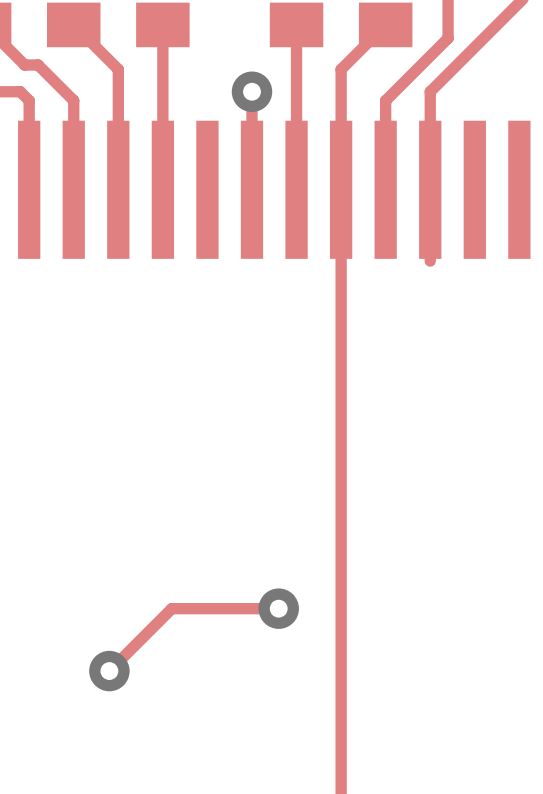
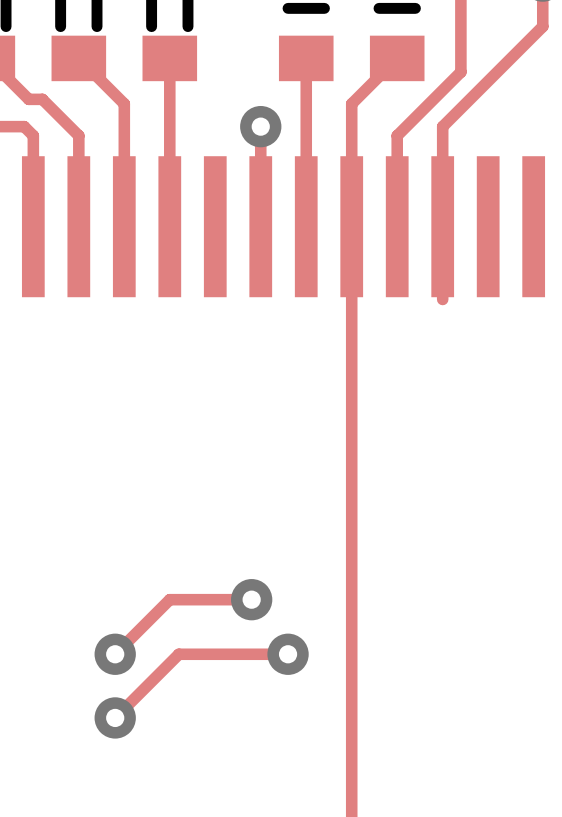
track: none -> (251, 599) (169, 599) (115, 654)
via: none -> (251, 599)
via: none -> (115, 654)

